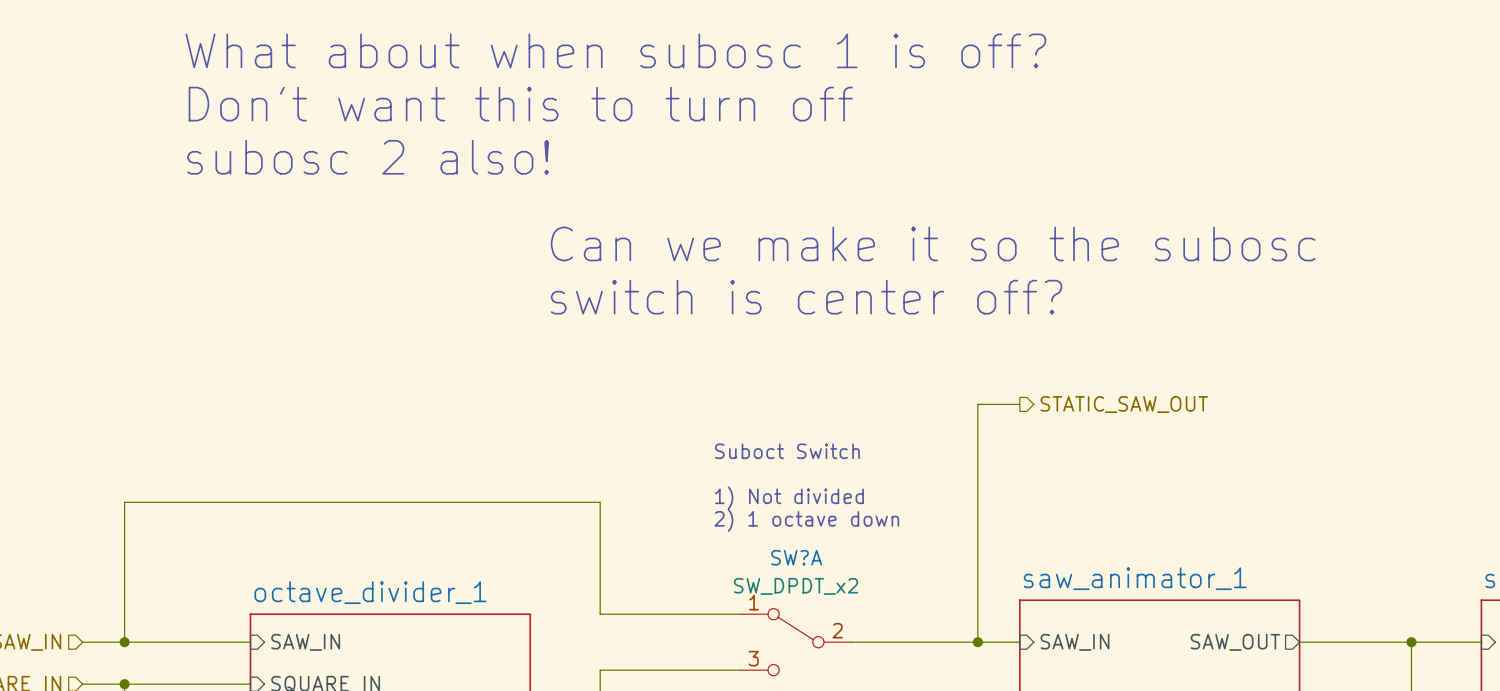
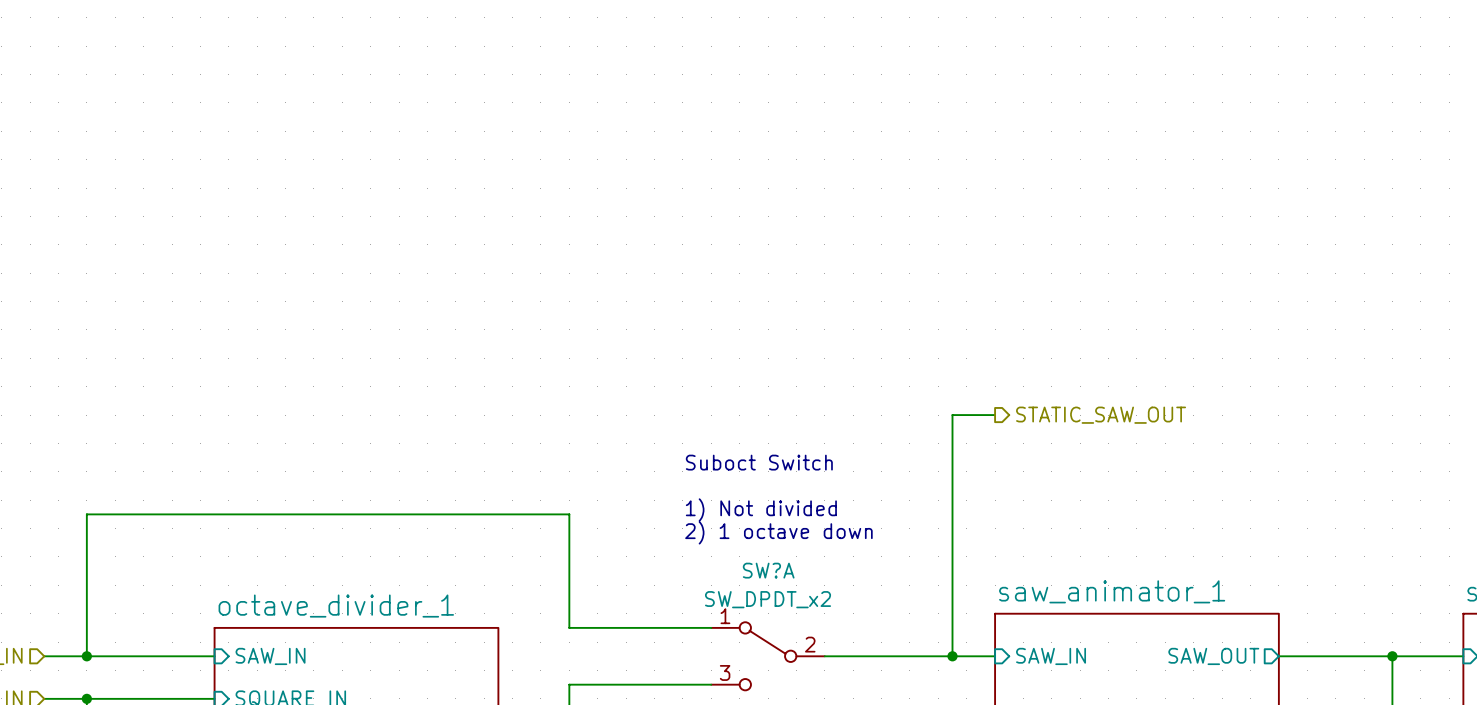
text: What about when subosc 1 is off? (615, 50) -> none
text: Don't want this to turn off (520, 104) -> none
text: subosc 2 also! (368, 157) -> none
text: Can we make it so the subosc (933, 243) -> none
text: switch is center off? (806, 297) -> none

